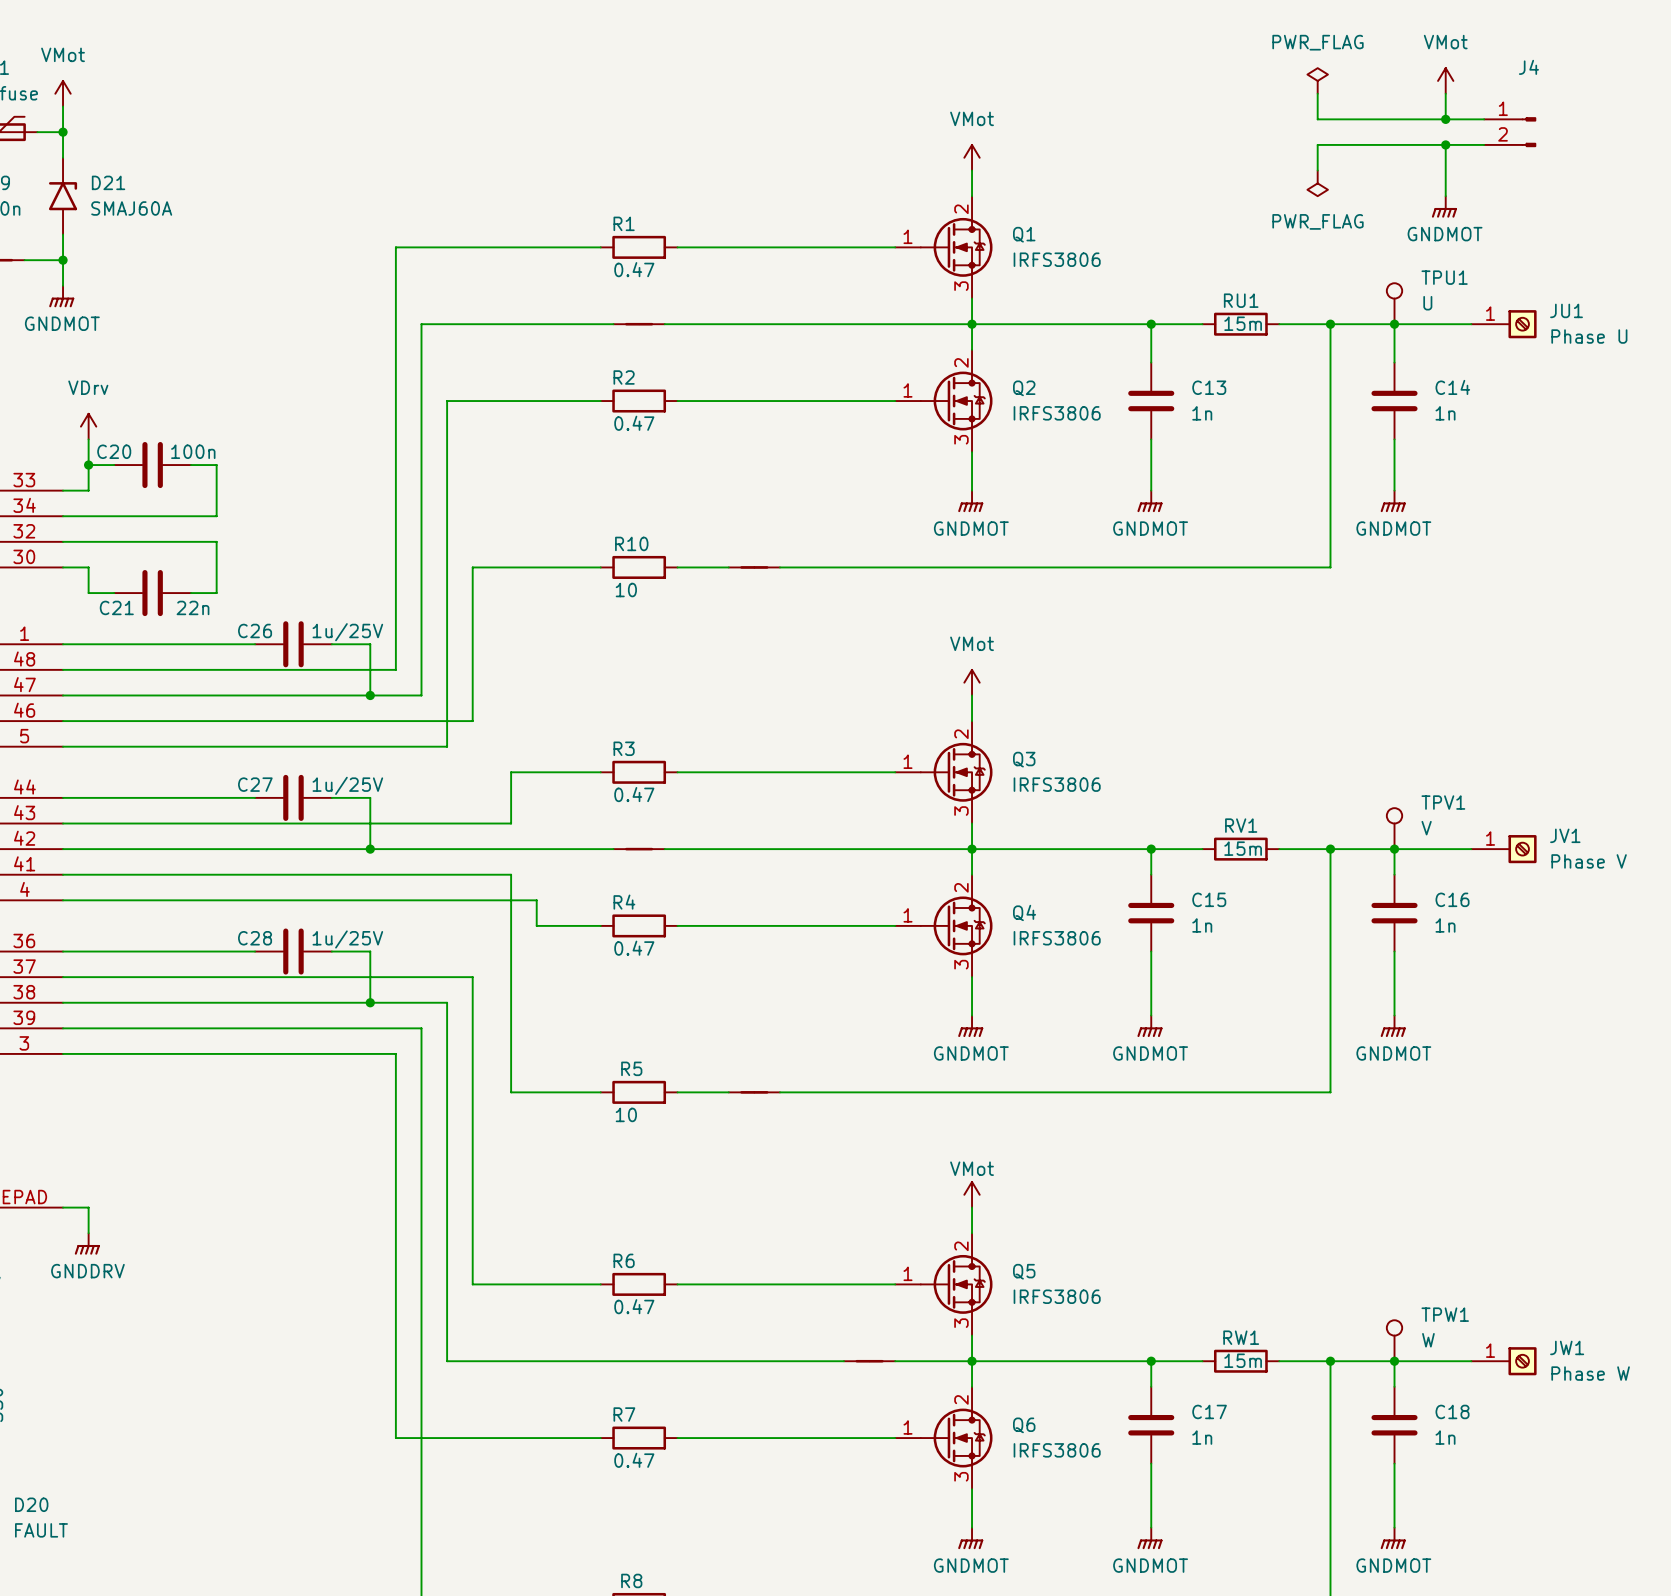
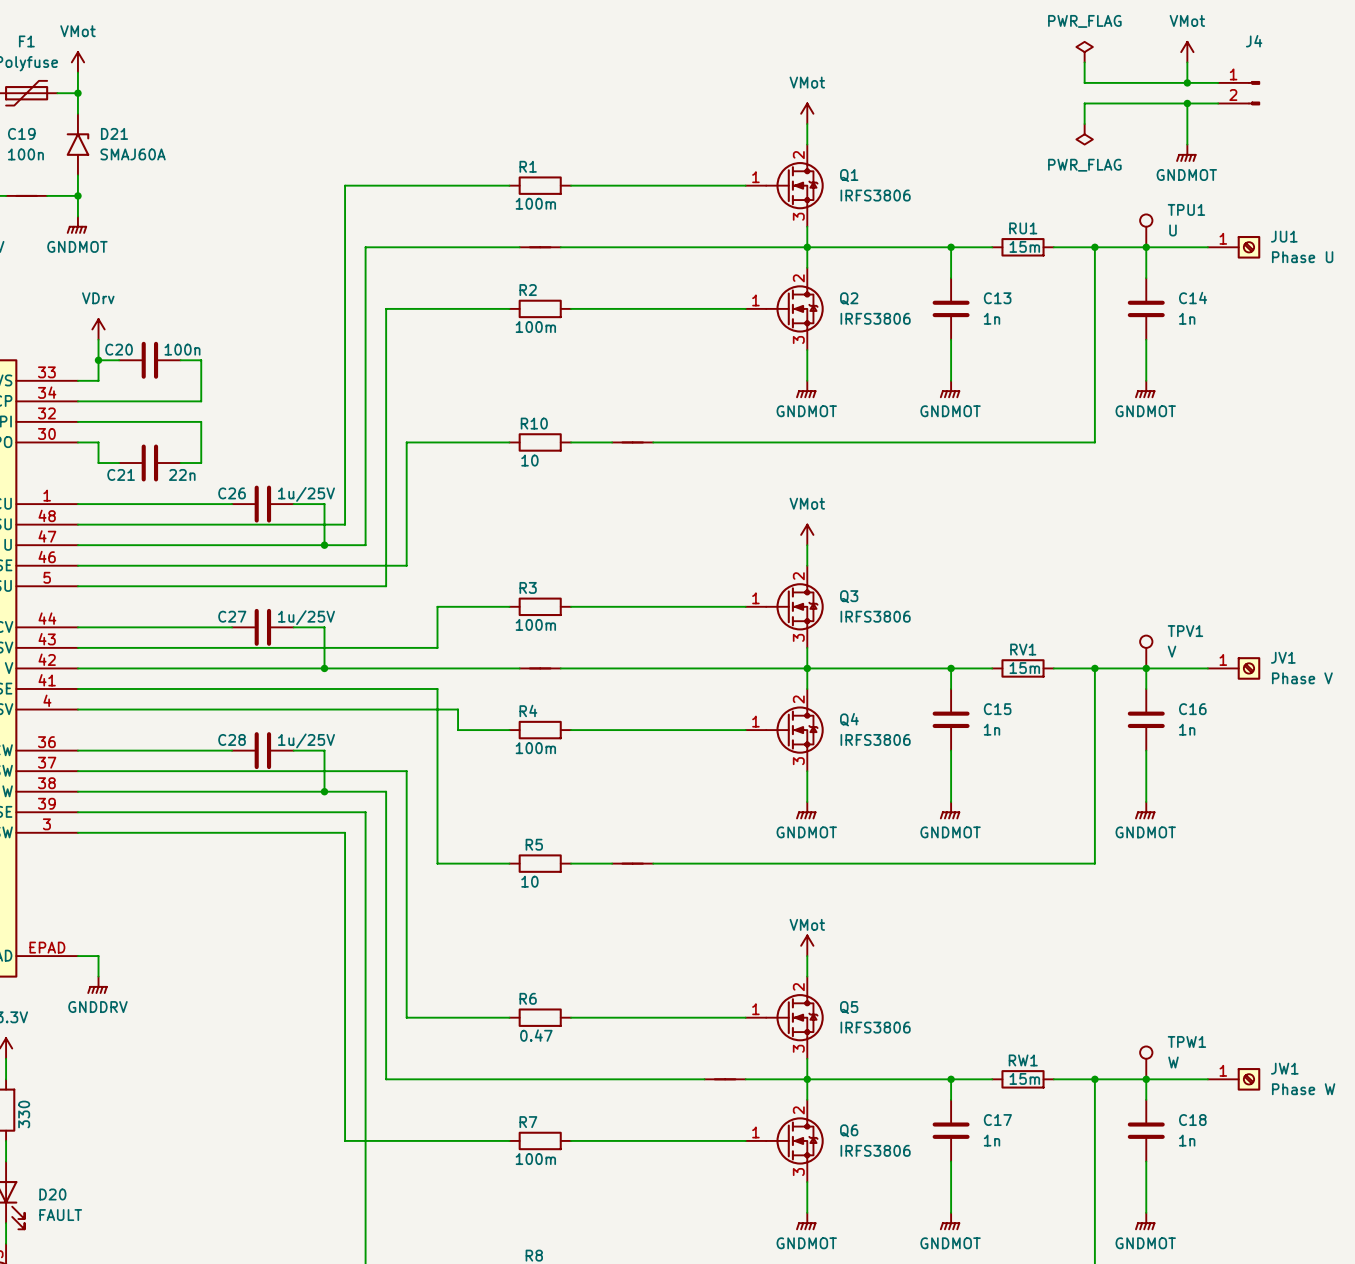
R1 value: 0.47 (634, 269) -> 100m (535, 203)
R2 value: 0.47 (634, 423) -> 100m (535, 327)
R3 value: 0.47 (634, 794) -> 100m (535, 624)
R4 value: 0.47 (634, 948) -> 100m (535, 748)
R7 value: 0.47 (634, 1460) -> 100m (535, 1159)

